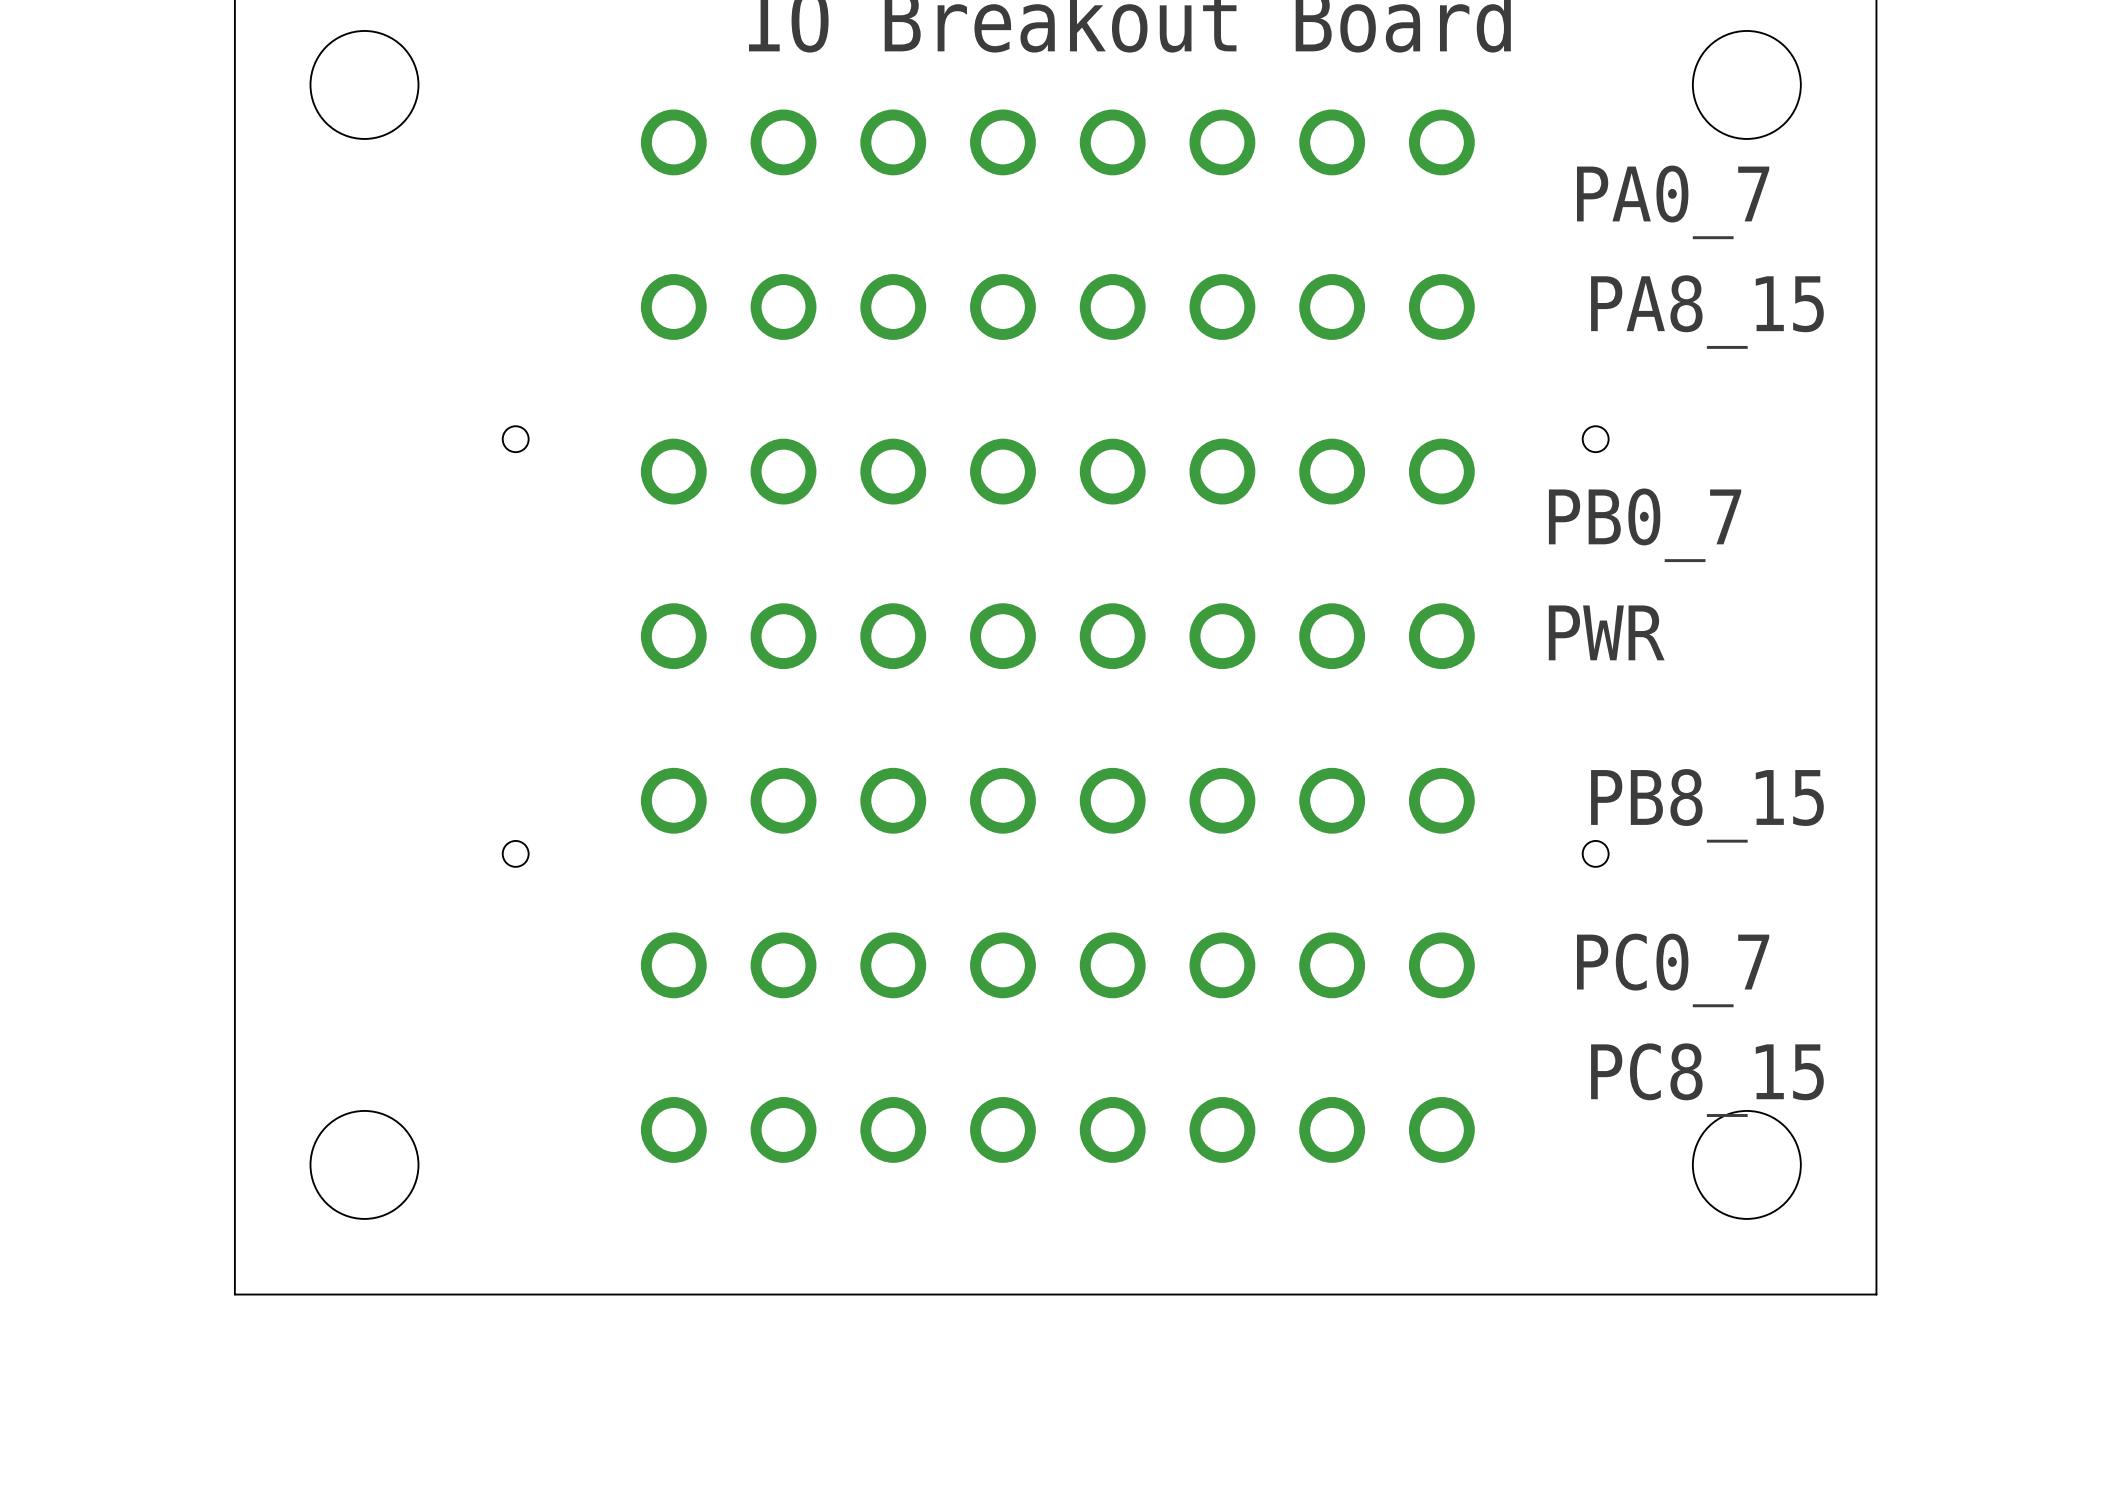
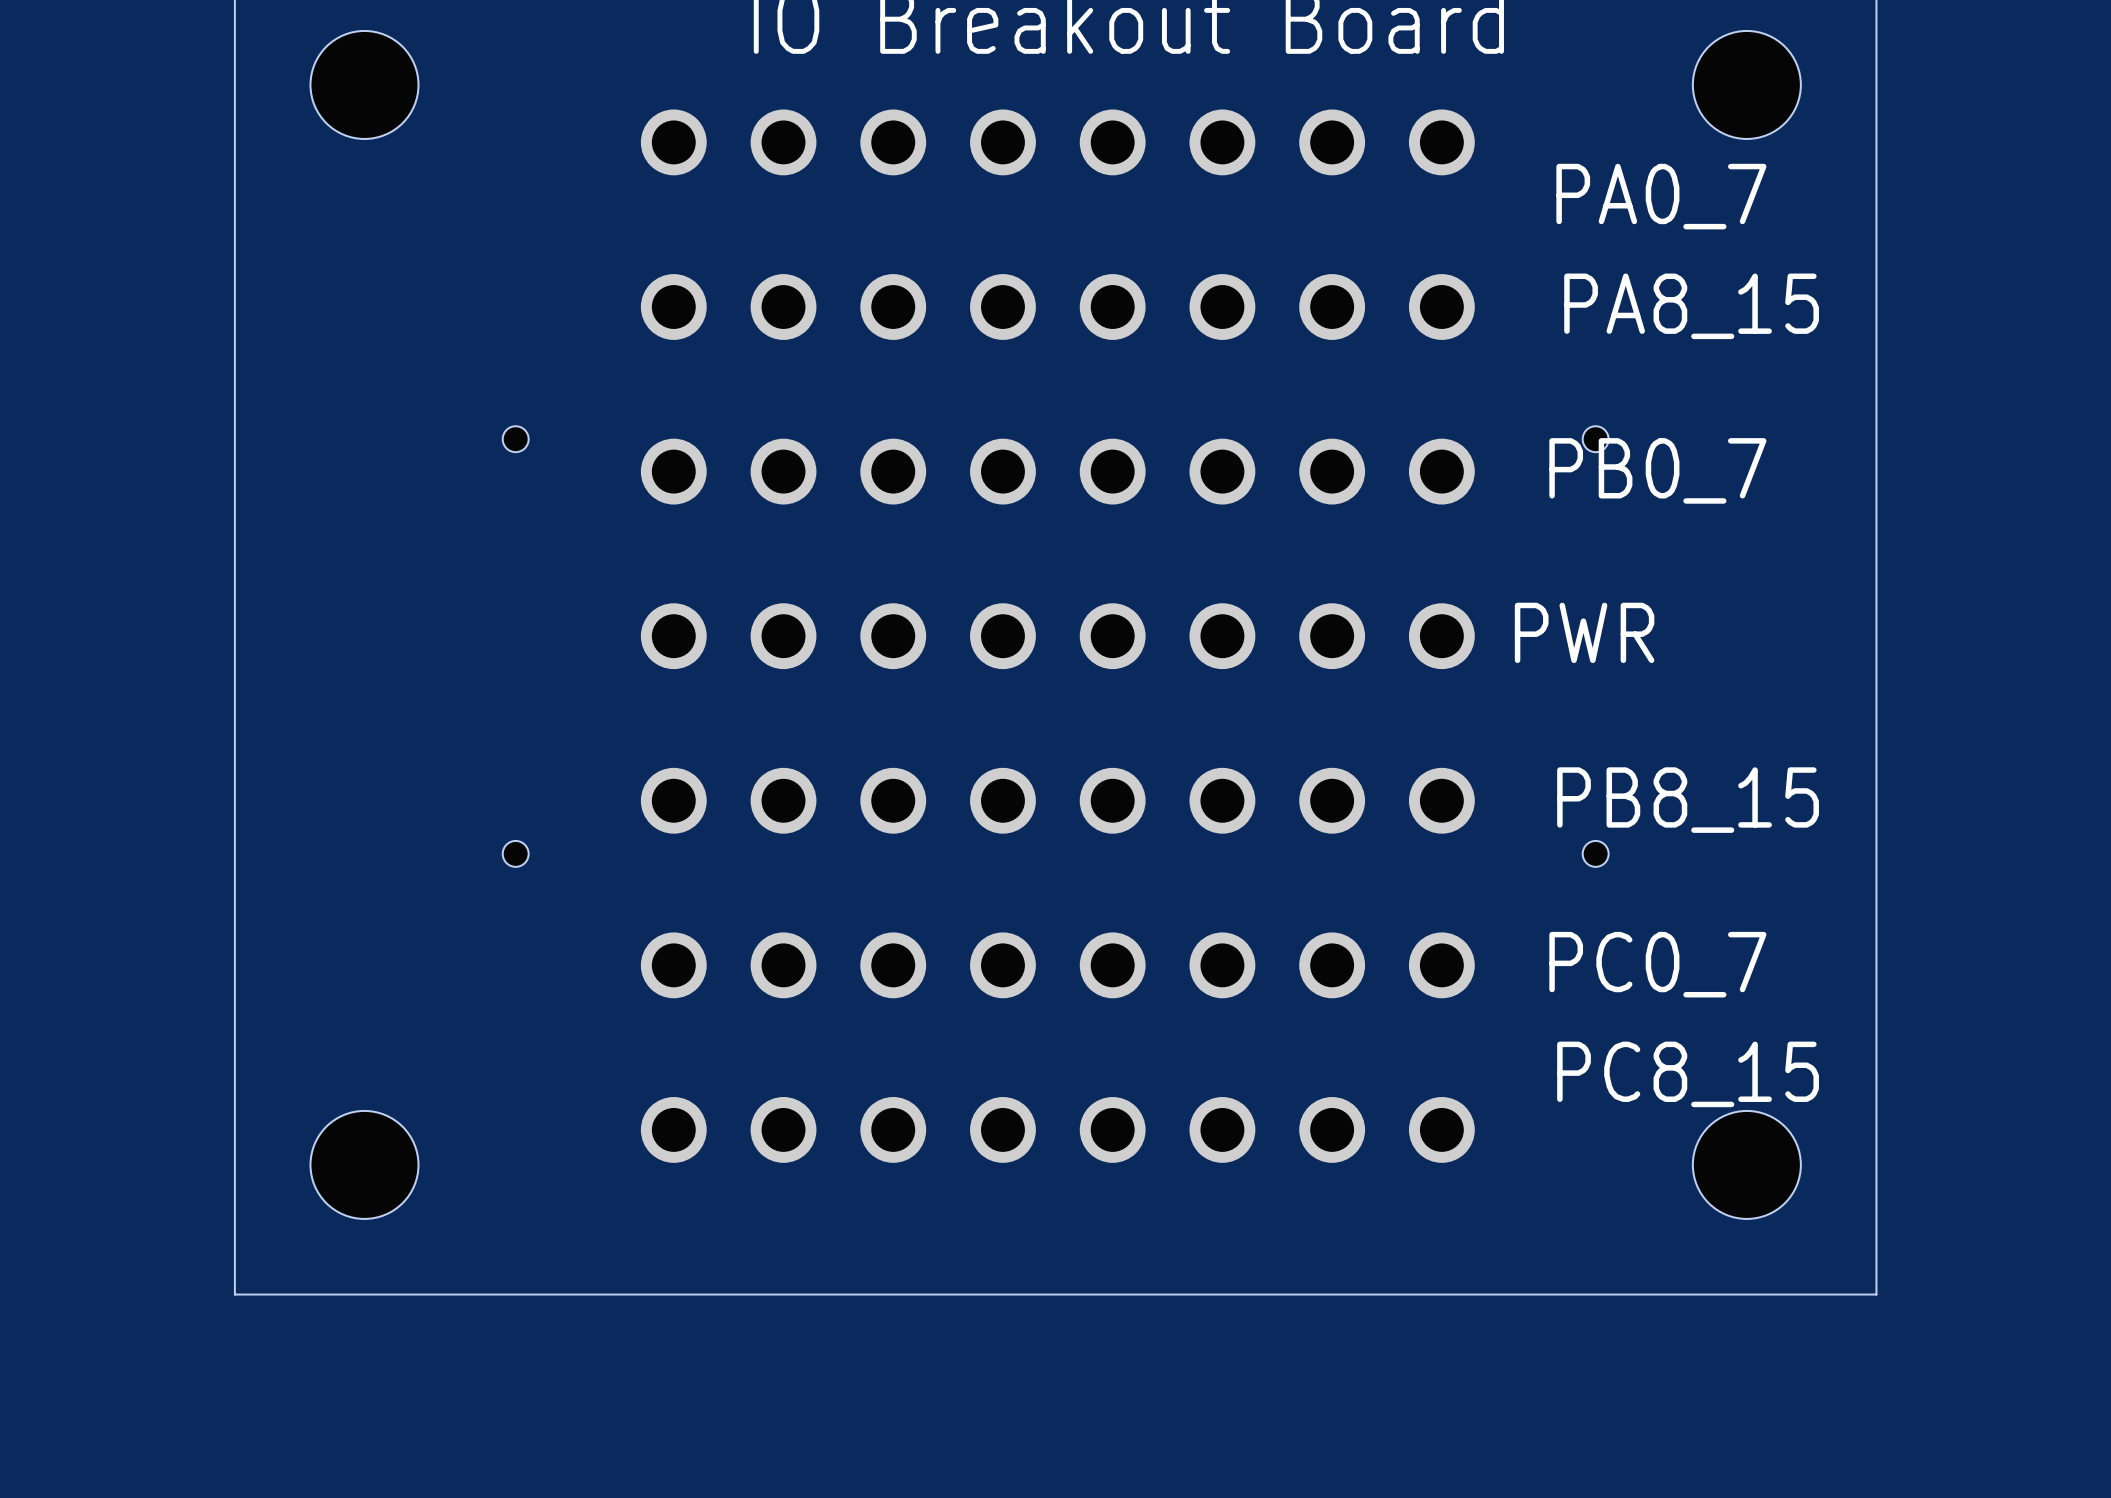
PB0_7 name position: PB0_7 (1645, 525) -> PB0_7 (1657, 470)

